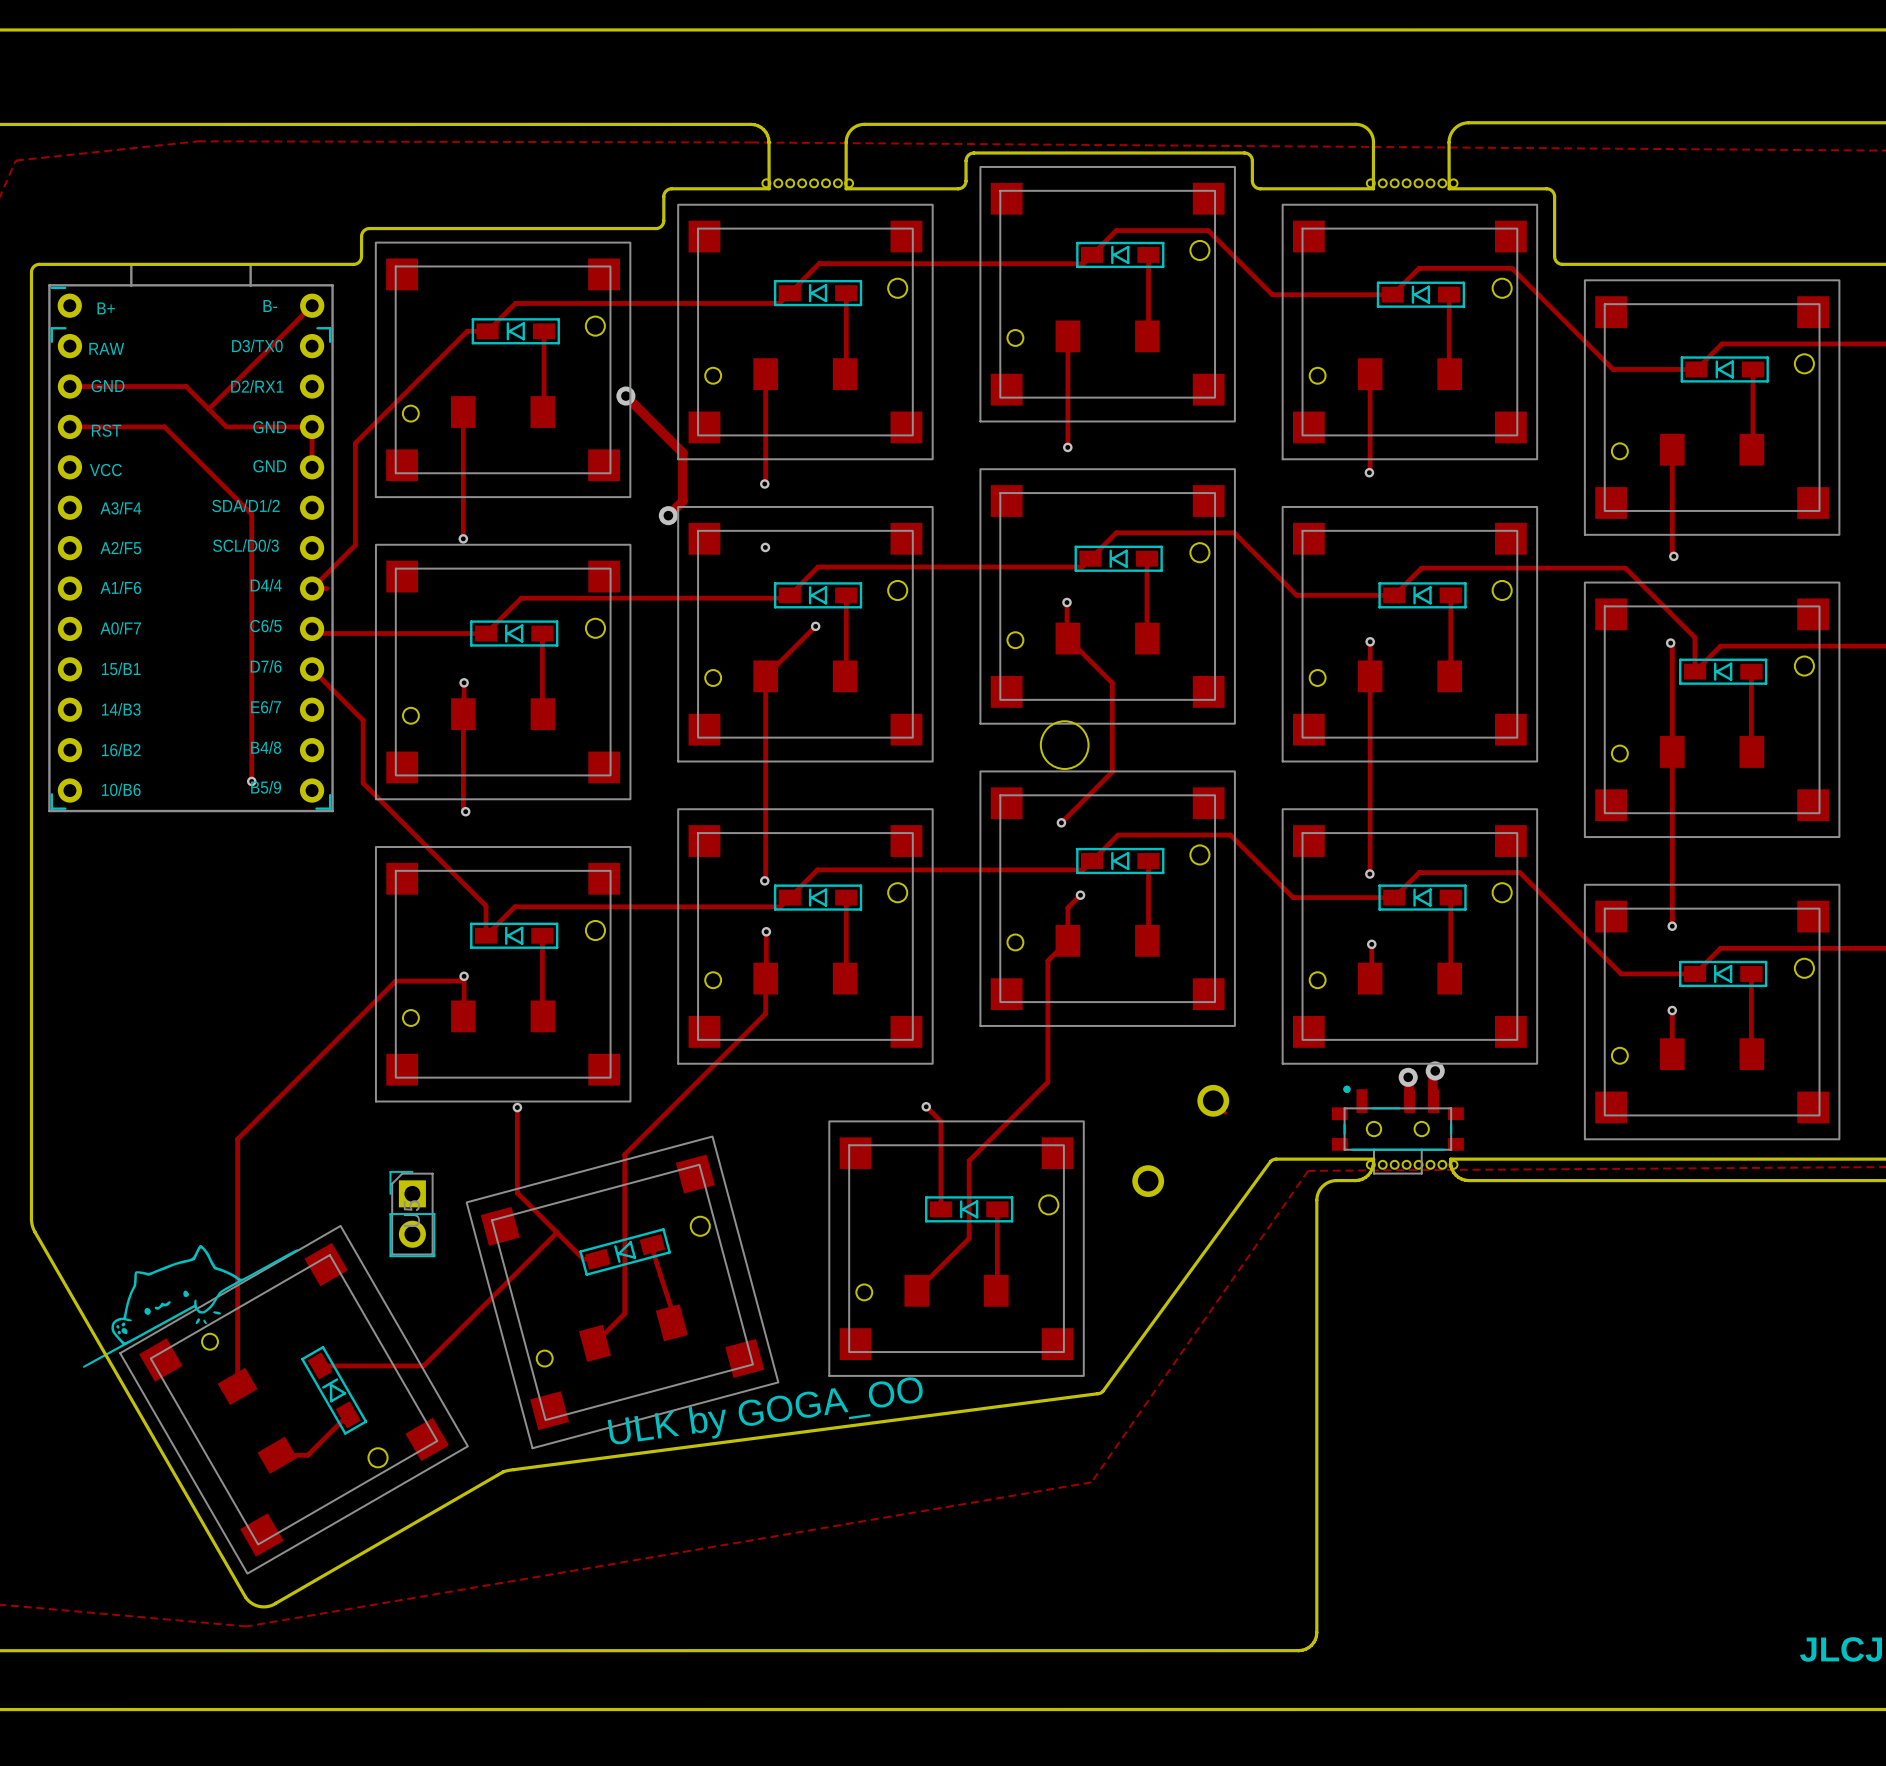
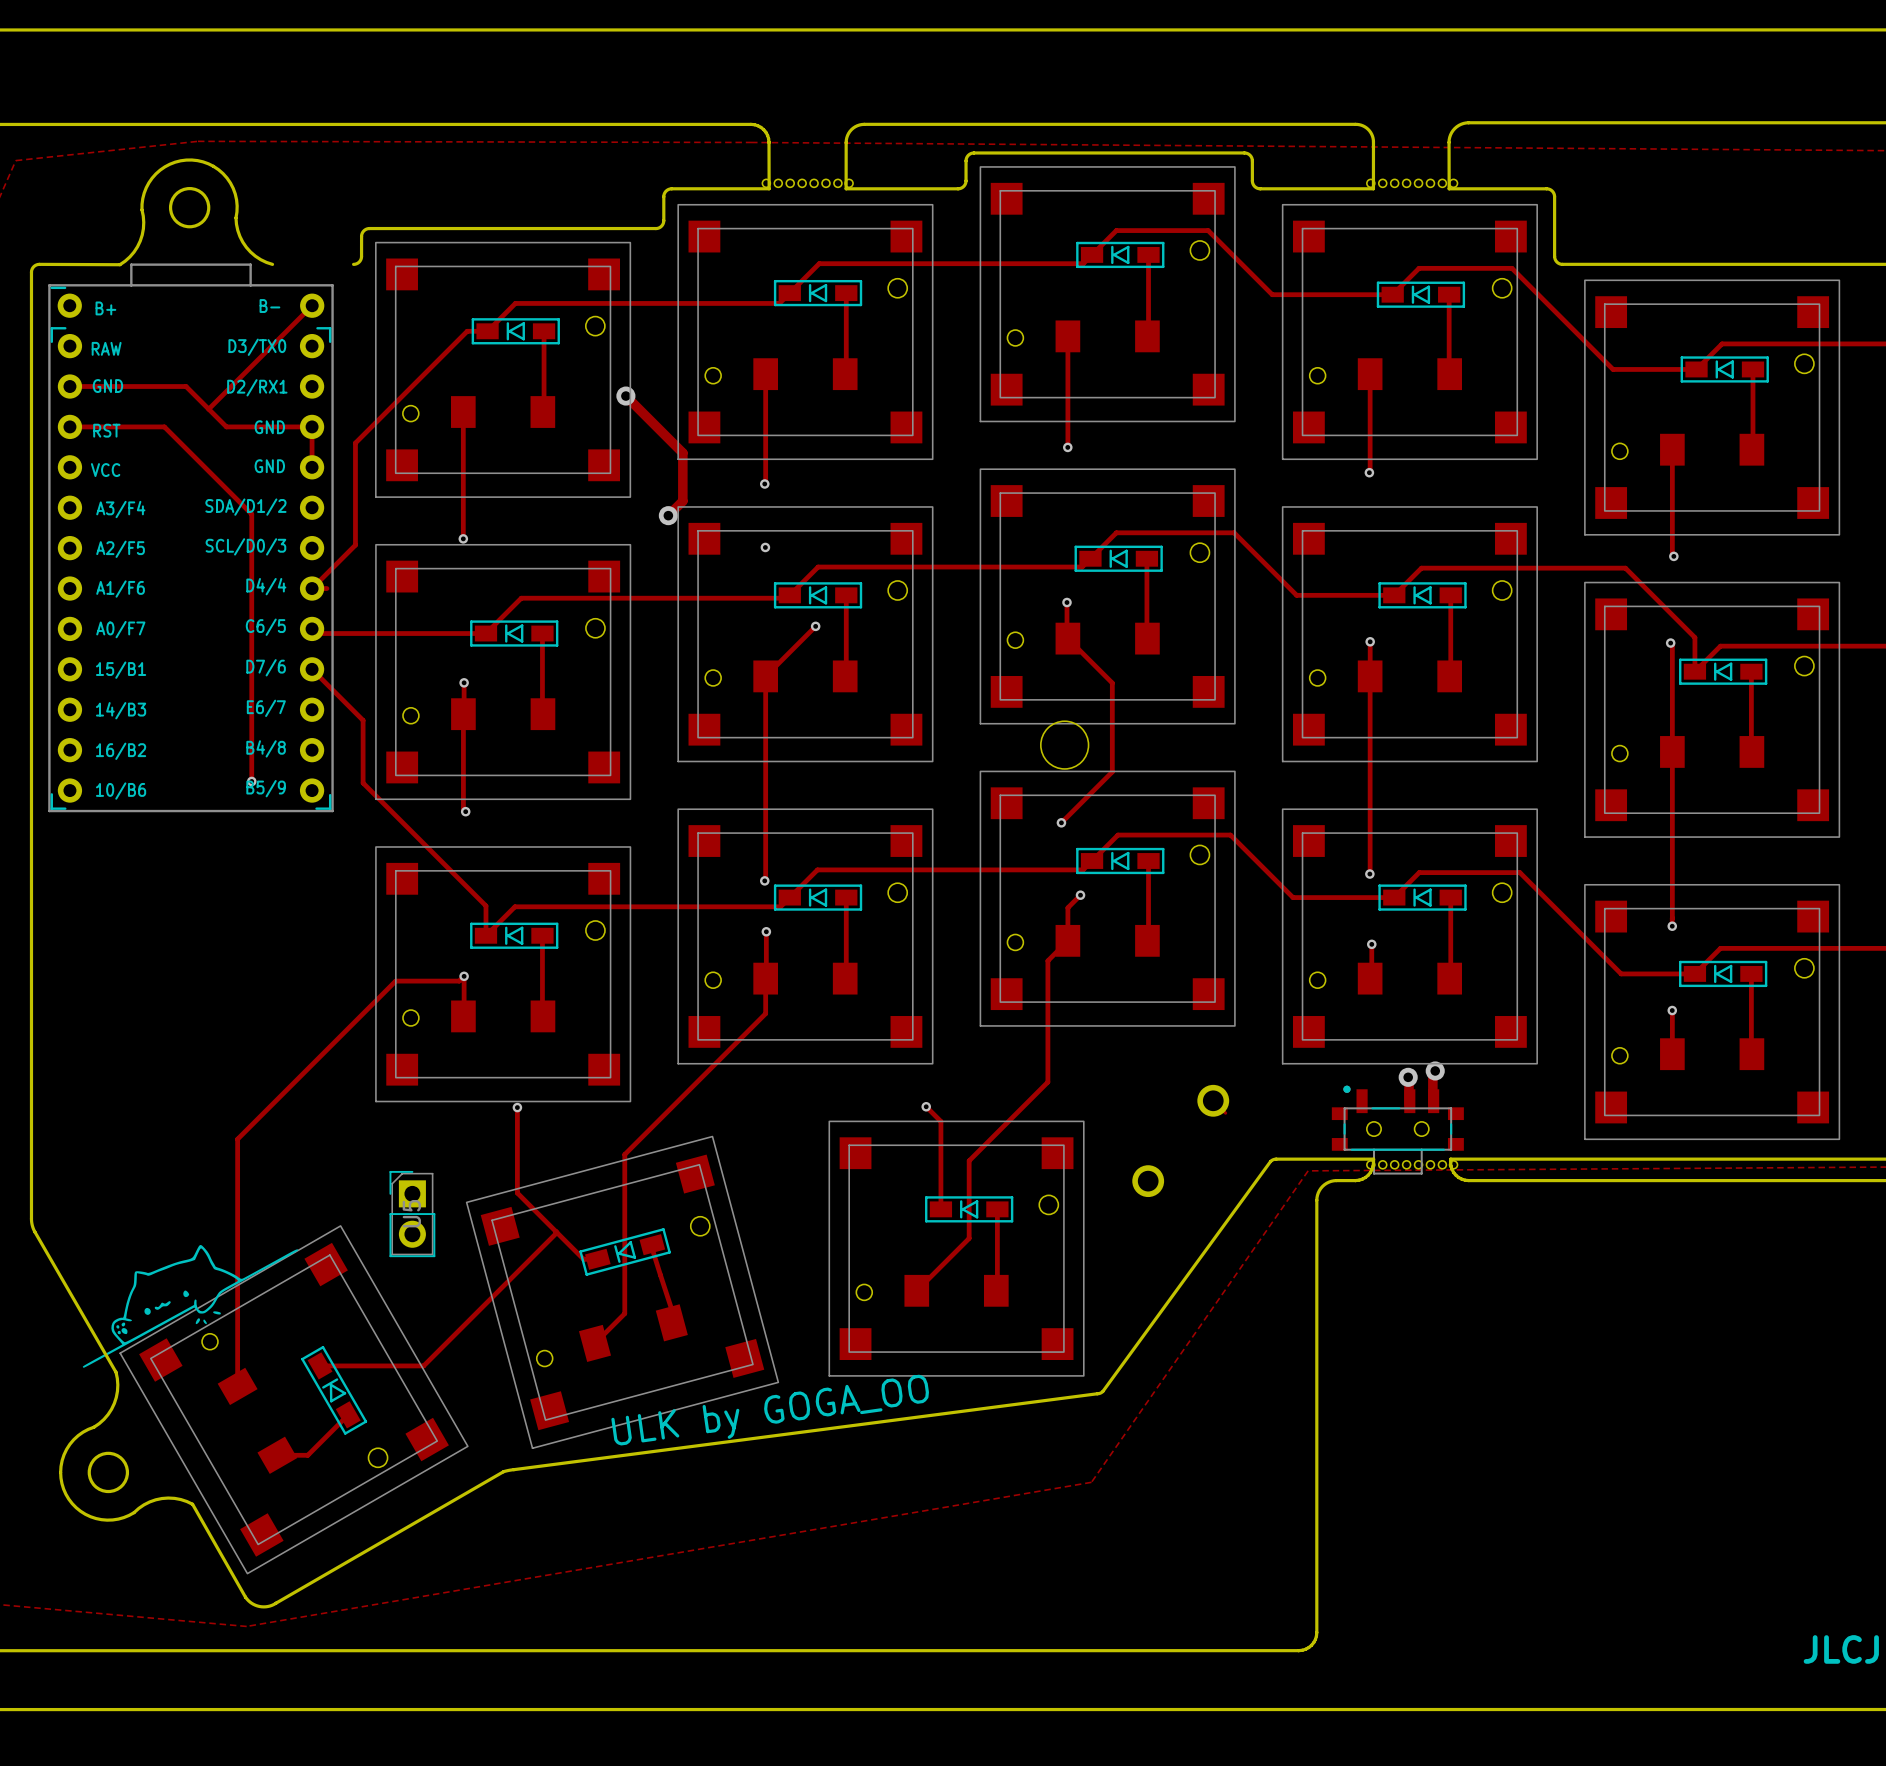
round board edge: none -> [168, 186, 211, 229]
board edge: (39, 264) (353, 264) -> (39, 264) (119, 264) (134, 252) (140, 241) (143, 228) (142, 198) (148, 182) (155, 173) (169, 164) (191, 160) (213, 166) (227, 178) (235, 194) (236, 224) (242, 242) (255, 256) (272, 264)
board edge: (35, 1232) (245, 1597) -> (35, 1232) (116, 1372) (117, 1378) (116, 1397) (108, 1414) (99, 1423) (78, 1435) (69, 1444) (64, 1454) (60, 1472) (65, 1494) (80, 1511) (95, 1518) (107, 1520) (123, 1517) (149, 1501) (161, 1498) (174, 1498) (192, 1504) (245, 1597)
round board edge: none -> [87, 1451, 130, 1494]

